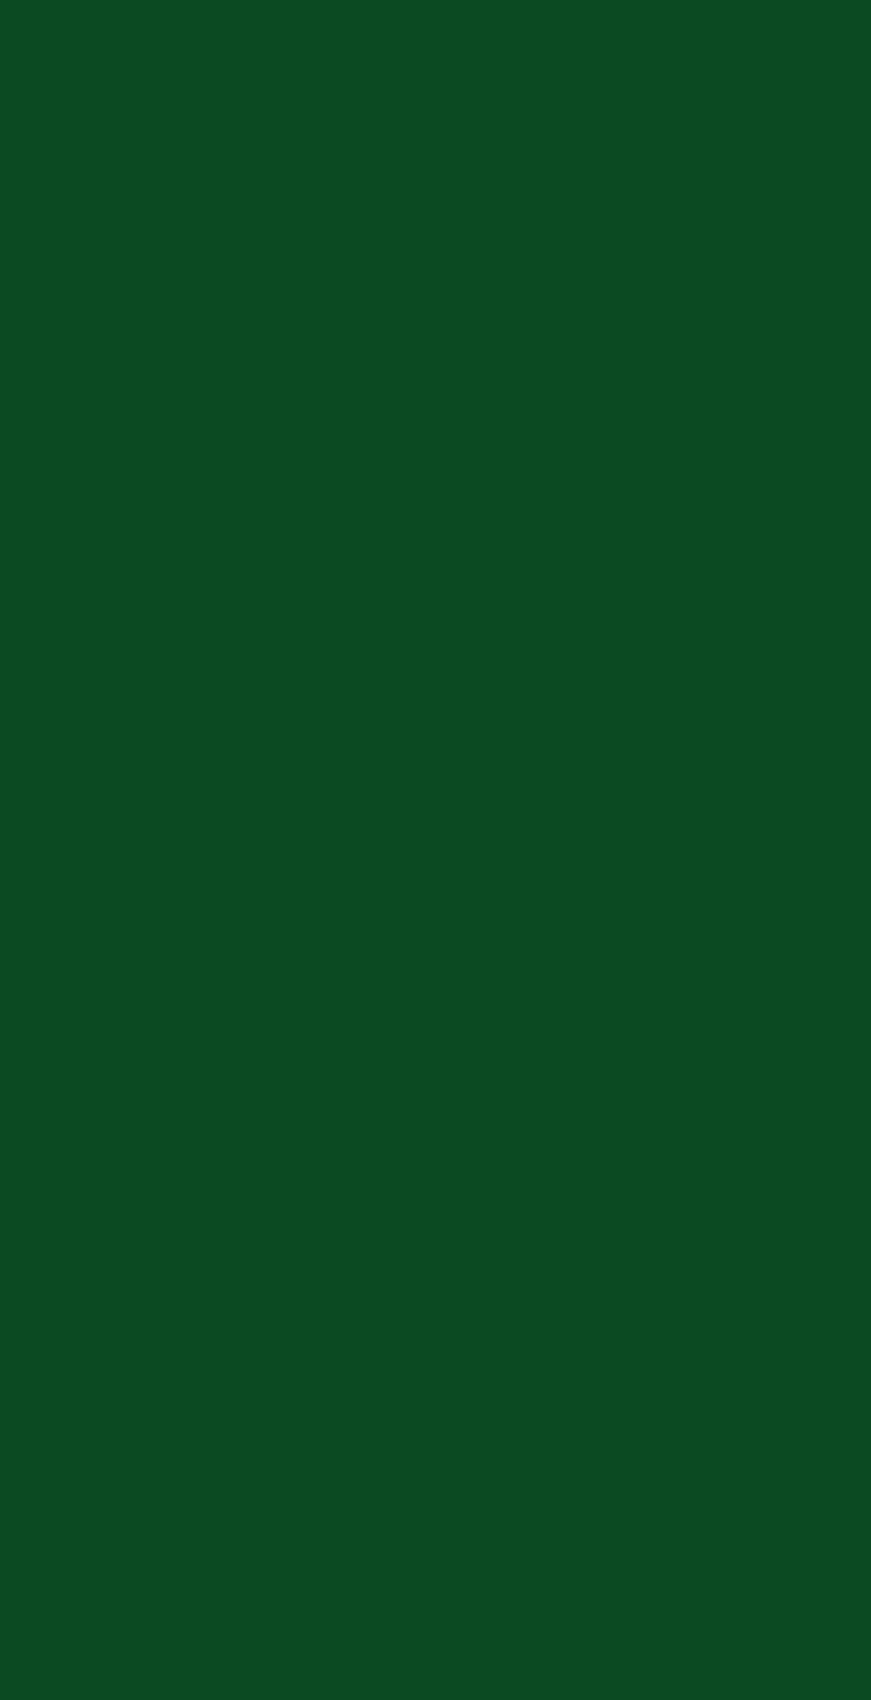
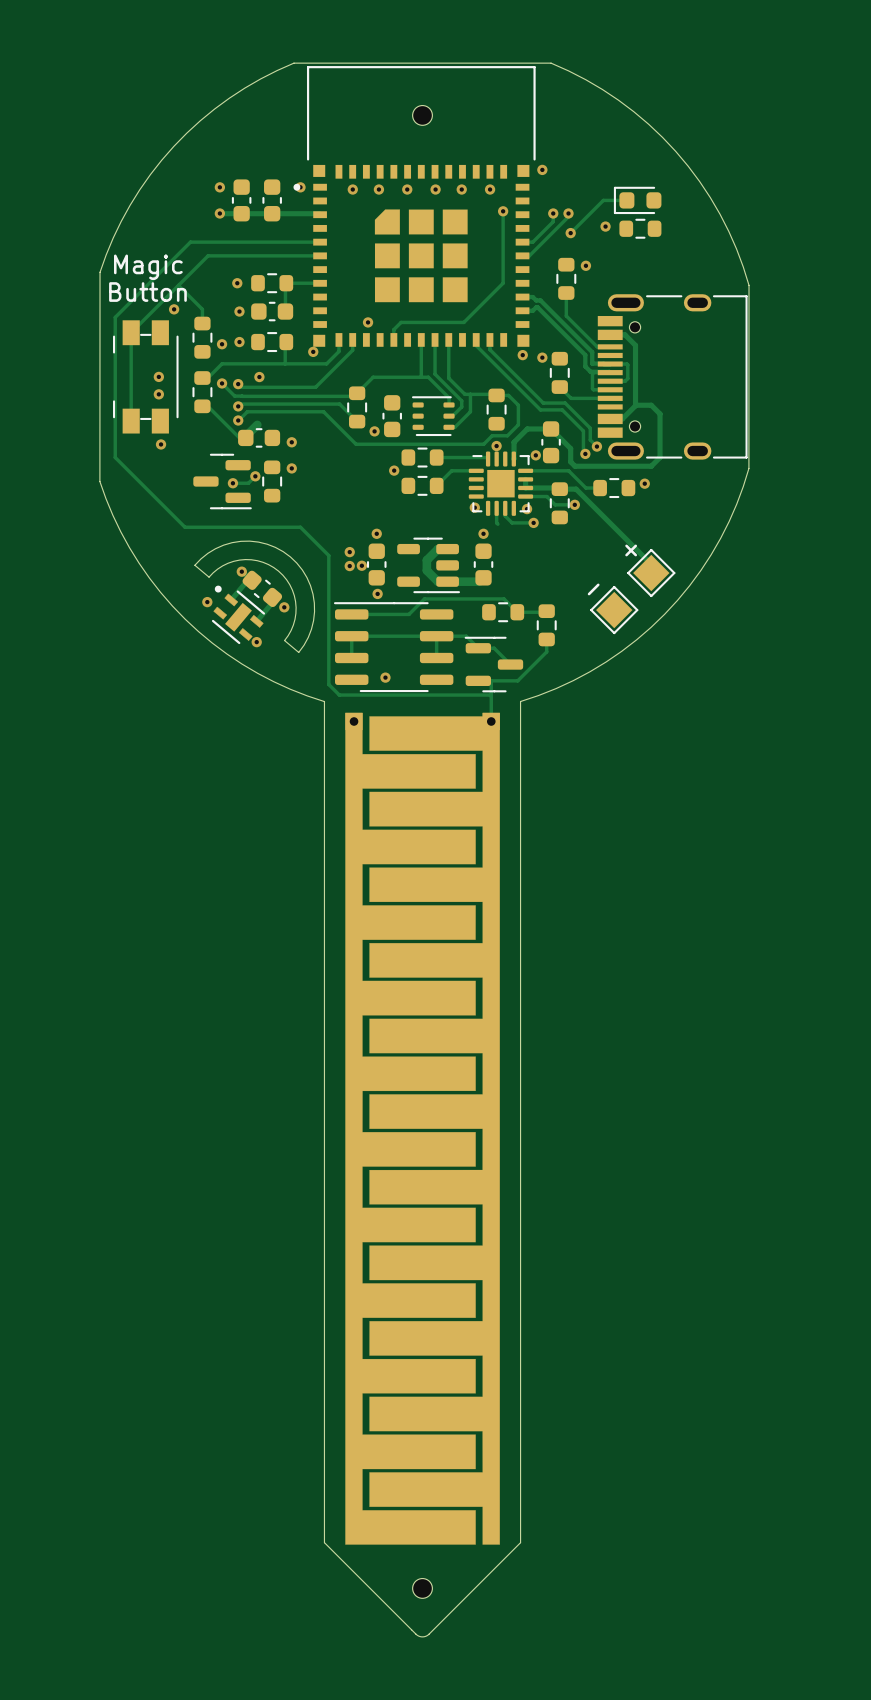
board edge: none -> (293, 63) (551, 63) (568, 70) (618, 100) (648, 124) (675, 151) (699, 181) (720, 214) (736, 248) (749, 285) (748, 468) (736, 504) (720, 538) (689, 585) (664, 614) (636, 639) (606, 661) (573, 680) (520, 701) (520, 1542) (429, 1634) (423, 1636) (415, 1634) (324, 1542) (324, 701) (273, 681) (242, 664) (212, 643) (185, 619) (149, 578) (129, 547) (112, 515) (99, 481) (100, 272) (113, 237) (130, 205) (150, 174) (186, 133) (214, 109) (244, 88) (293, 63)
part: none -> (422, 115)
via: none -> (542, 169)
via: none -> (219, 187)
via: none -> (300, 187)
via: none -> (352, 189)
via: none -> (378, 189)
via: none -> (407, 189)
via: none -> (435, 189)
via: none -> (461, 189)
via: none -> (490, 189)
part: none -> (241, 200)
part: none -> (272, 200)
track: none -> (626, 200) (603, 200) (570, 233)
part: none -> (637, 200)
part: none -> (414, 206)
track: none -> (503, 211) (503, 283) (463, 322) (401, 322) (393, 329) (393, 339)
via: none -> (503, 211)
via: none -> (219, 213)
track: none -> (220, 213) (320, 214)
track: none -> (553, 213) (553, 221) (532, 242) (522, 242)
via: none -> (553, 213)
track: none -> (568, 213) (568, 216) (529, 255) (522, 255)
via: none -> (568, 213)
via: none -> (605, 226)
part: none -> (640, 228)
via: none -> (570, 233)
track: none -> (320, 242) (190, 242) (115, 317) (115, 457) (185, 527) (300, 527) (328, 555) (328, 684) (339, 695) (491, 696)
track: none -> (320, 255) (208, 255) (131, 332) (131, 421)
via: none -> (585, 265)
text: none -> Magic (148, 267)
part: none -> (566, 278)
via: none -> (237, 283)
part: none -> (272, 283)
track: none -> (319, 283) (286, 283) (285, 311)
track: none -> (178, 285) (202, 309) (202, 323)
text: none -> Button (147, 292)
track: none -> (566, 293) (566, 315) (597, 346) (610, 346)
track: none -> (522, 297) (532, 297) (536, 300) (540, 300) (592, 352) (592, 363) (627, 364) (627, 378) (625, 381) (610, 381)
via: none -> (174, 309)
track: none -> (522, 310) (532, 310) (537, 307) (585, 355) (585, 366) (590, 371) (609, 371) (592, 373) (592, 388) (610, 389)
via: none -> (239, 311)
part: none -> (272, 311)
via: none -> (368, 322)
track: none -> (610, 334) (624, 334) (635, 345) (635, 405)
part: none -> (202, 337)
track: none -> (338, 339) (338, 351) (326, 363) (222, 363) (207, 378) (202, 378)
track: none -> (352, 339) (352, 350) (315, 387) (241, 387) (238, 384)
track: none -> (421, 339) (421, 377)
track: none -> (435, 339) (435, 374) (461, 400) (461, 406) (452, 416) (449, 416)
track: none -> (448, 339) (448, 378) (464, 394) (508, 395) (518, 405) (518, 424) (507, 435) (492, 435) (483, 444) (356, 444) (323, 411) (247, 411) (238, 420)
track: none -> (476, 339) (476, 345) (540, 409) (562, 409) (583, 431) (583, 452) (585, 453)
track: none -> (489, 339) (489, 349) (543, 403) (565, 403) (590, 428) (590, 439) (596, 446)
via: none -> (239, 342)
part: none -> (272, 342)
track: none -> (286, 342) (285, 363)
via: none -> (222, 344)
via: none -> (313, 351)
via: none -> (522, 355)
via: none -> (542, 357)
part: none -> (559, 372)
part: none -> (145, 376)
via: none -> (158, 376)
part: none -> (672, 376)
via: none -> (259, 377)
track: none -> (222, 383) (234, 396) (242, 396)
via: none -> (222, 383)
via: none -> (238, 384)
track: none -> (559, 387) (571, 398) (610, 398)
part: none -> (202, 392)
via: none -> (158, 394)
track: none -> (470, 394) (470, 411) (454, 427) (449, 427)
track: none -> (242, 396) (354, 396) (373, 377) (428, 377) (449, 397) (449, 404)
track: none -> (202, 406) (207, 406) (239, 437) (245, 437) (257, 424)
track: none -> (238, 406) (240, 404) (339, 404) (357, 421)
via: none -> (238, 406)
part: none -> (357, 407)
part: none -> (496, 409)
part: none -> (392, 416)
part: none -> (433, 416)
track: none -> (610, 418) (622, 418) (636, 405) (651, 405) (660, 413) (660, 457) (651, 466) (575, 466) (570, 461) (570, 448) (551, 428) (527, 428) (514, 442) (514, 458)
via: none -> (238, 420)
via: none -> (374, 431)
part: none -> (259, 437)
via: none -> (291, 442)
part: none -> (551, 442)
via: none -> (161, 444)
via: none -> (496, 446)
via: none -> (596, 446)
via: none -> (585, 453)
via: none -> (535, 455)
part: none -> (422, 457)
track: none -> (436, 457) (488, 459)
via: none -> (291, 468)
via: none -> (394, 470)
track: none -> (476, 470) (451, 470) (436, 485)
track: none -> (525, 470) (568, 470) (585, 488) (600, 488)
track: none -> (255, 476) (248, 483) (232, 483)
via: none -> (255, 476)
track: none -> (525, 479) (525, 487) (576, 489) (651, 564) (651, 573)
part: none -> (222, 481)
part: none -> (272, 481)
via: none -> (232, 483)
part: none -> (500, 483)
via: none -> (644, 483)
part: none -> (422, 485)
part: none -> (614, 488)
track: none -> (525, 496) (546, 496) (555, 504) (574, 504)
part: none -> (559, 503)
via: none -> (574, 504)
via: none -> (474, 507)
track: none -> (496, 508) (497, 524)
track: none -> (505, 508) (505, 516) (512, 522) (533, 522)
via: none -> (527, 509)
via: none -> (533, 522)
via: none -> (376, 533)
via: none -> (483, 533)
track: none -> (447, 549) (437, 549) (426, 560) (426, 570) (437, 581) (479, 581) (483, 577)
text: none -> + (631, 550)
via: none -> (349, 552)
part: none -> (376, 564)
part: none -> (483, 564)
board edge: none -> (194, 565) (209, 577) (228, 563) (245, 559) (263, 562) (278, 571) (289, 584) (296, 607) (293, 625) (284, 640) (298, 652) (311, 629) (314, 602) (306, 577) (290, 556) (267, 544) (240, 541) (215, 548) (194, 565)
via: none -> (361, 565)
part: none -> (428, 565)
via: none -> (349, 566)
via: none -> (241, 571)
part: none -> (651, 573)
track: none -> (247, 580) (231, 599)
part: none -> (262, 588)
text: none -> - (593, 589)
via: none -> (377, 593)
via: none -> (207, 602)
track: none -> (272, 602) (256, 621)
via: none -> (284, 607)
part: none -> (614, 610)
track: none -> (546, 611) (517, 612) (504, 598) (424, 598) (409, 614) (351, 614)
part: none -> (503, 612)
part: none -> (238, 614)
part: none -> (546, 625)
track: none -> (436, 636) (436, 658)
track: none -> (546, 639) (546, 651) (517, 680) (478, 680)
via: none -> (256, 642)
part: none -> (393, 647)
track: none -> (351, 658) (351, 636) (466, 636) (478, 648) (494, 648) (510, 664)
part: none -> (493, 664)
via: none -> (385, 677)
track: none -> (491, 680) (491, 721)
part: none -> (422, 1128)
part: none -> (422, 1588)

